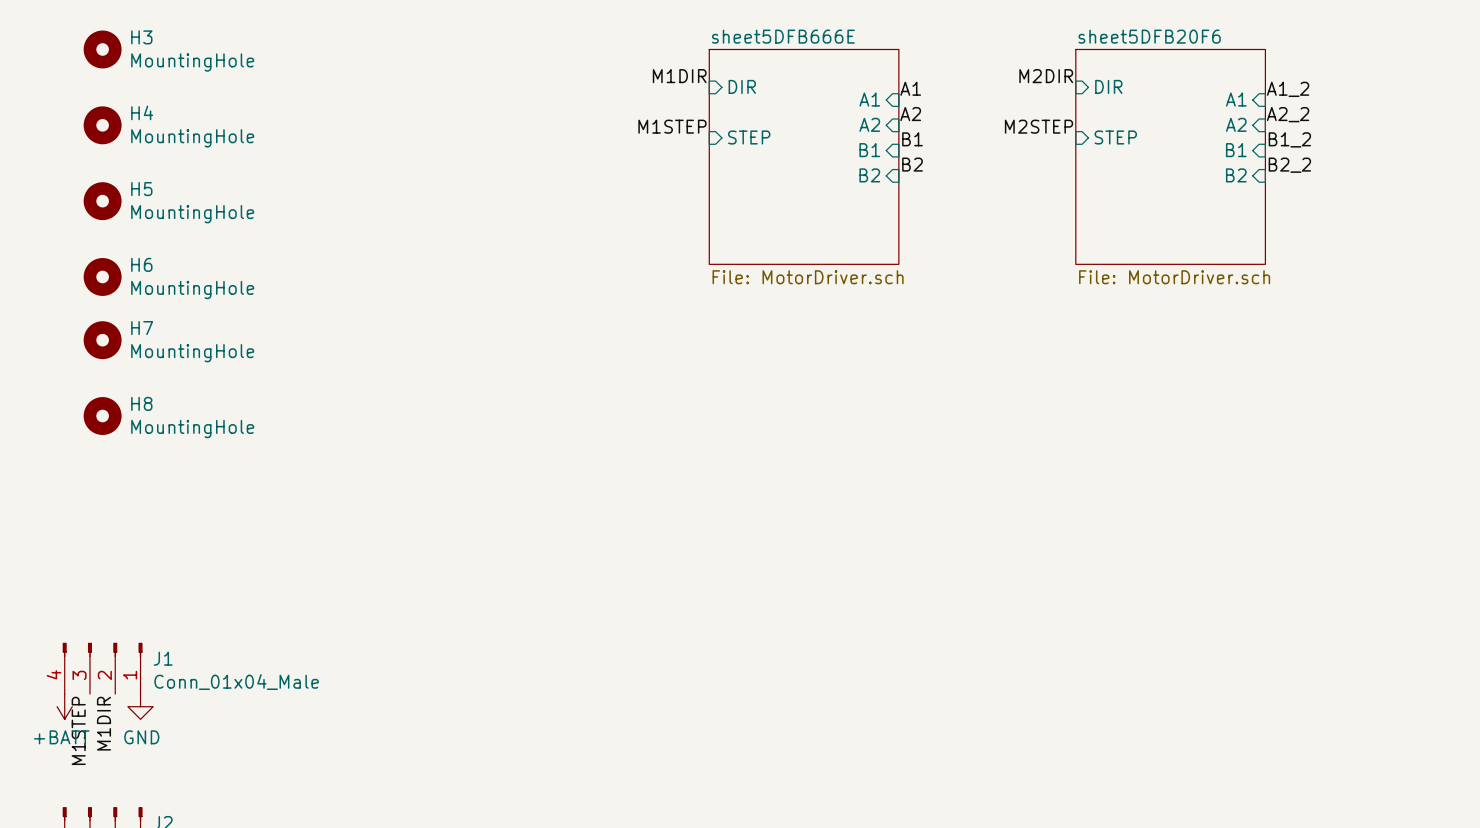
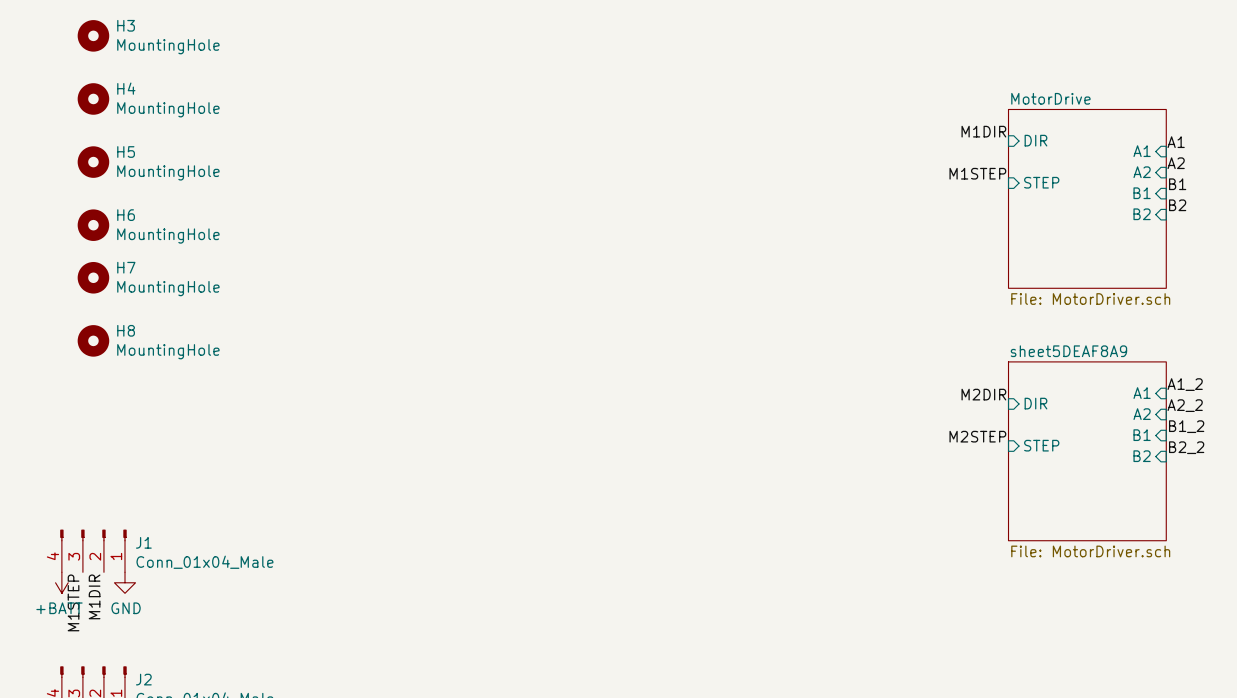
label: M1DIR (679, 76) -> none
label: M2DIR (1046, 76) -> none
sheet pin: DIR (742, 86) -> none
sheet pin position: DIR (1108, 86) -> DIR (1035, 140)
label: A1 (910, 88) -> none
label: A1_2 (1288, 89) -> none
sheet pin: A1 (869, 99) -> none
sheet pin position: A1 (1236, 99) -> A1 (1142, 151)
label: A2 (910, 114) -> none
label: A2_2 (1288, 114) -> none
sheet pin: A2 (869, 124) -> none
sheet pin position: A2 (1236, 124) -> A2 (1142, 172)
label: M1STEP (672, 126) -> none
label: M2STEP (1039, 126) -> none
sheet pin: STEP (749, 137) -> none
sheet pin position: STEP (1115, 137) -> STEP (1041, 182)
label: B1 (912, 139) -> none
label: B1_2 (1289, 139) -> none
sheet pin: B1 (869, 150) -> none
sheet pin position: B1 (1236, 150) -> B1 (1142, 193)
sheet sheet5DFB666E: File: MotorDriver.sch (804, 156) -> none
sheet sheet5DFB20F6: File: MotorDriver.sch (1170, 156) -> none
label: B2 (912, 164) -> none
label: none -> M1DIR (983, 131)
label: B2_2 (1289, 165) -> none
sheet pin: B2 (869, 175) -> none
sheet pin position: B2 (1236, 175) -> B2 (1142, 214)
label: none -> A1 (1176, 142)
label: none -> A2 (1176, 163)
label: none -> M1STEP (977, 173)
label: none -> B1 (1177, 184)
sheet MotorDrive: none -> File: MotorDriver.sch (1087, 198)
label: none -> B2 (1177, 205)
label: none -> A1_2 (1185, 384)
sheet pin: none -> A1 (1142, 393)
label: none -> M2DIR (983, 394)
sheet pin: none -> DIR (1035, 403)
label: none -> A2_2 (1185, 405)
sheet pin: none -> A2 (1142, 414)
label: none -> B1_2 (1186, 426)
sheet pin: none -> B1 (1142, 435)
label: none -> M2STEP (977, 436)
sheet pin: none -> STEP (1041, 445)
label: none -> B2_2 (1186, 447)
sheet sheet5DEAF8A9: none -> File: MotorDriver.sch (1087, 451)
sheet pin: none -> B2 (1142, 456)

